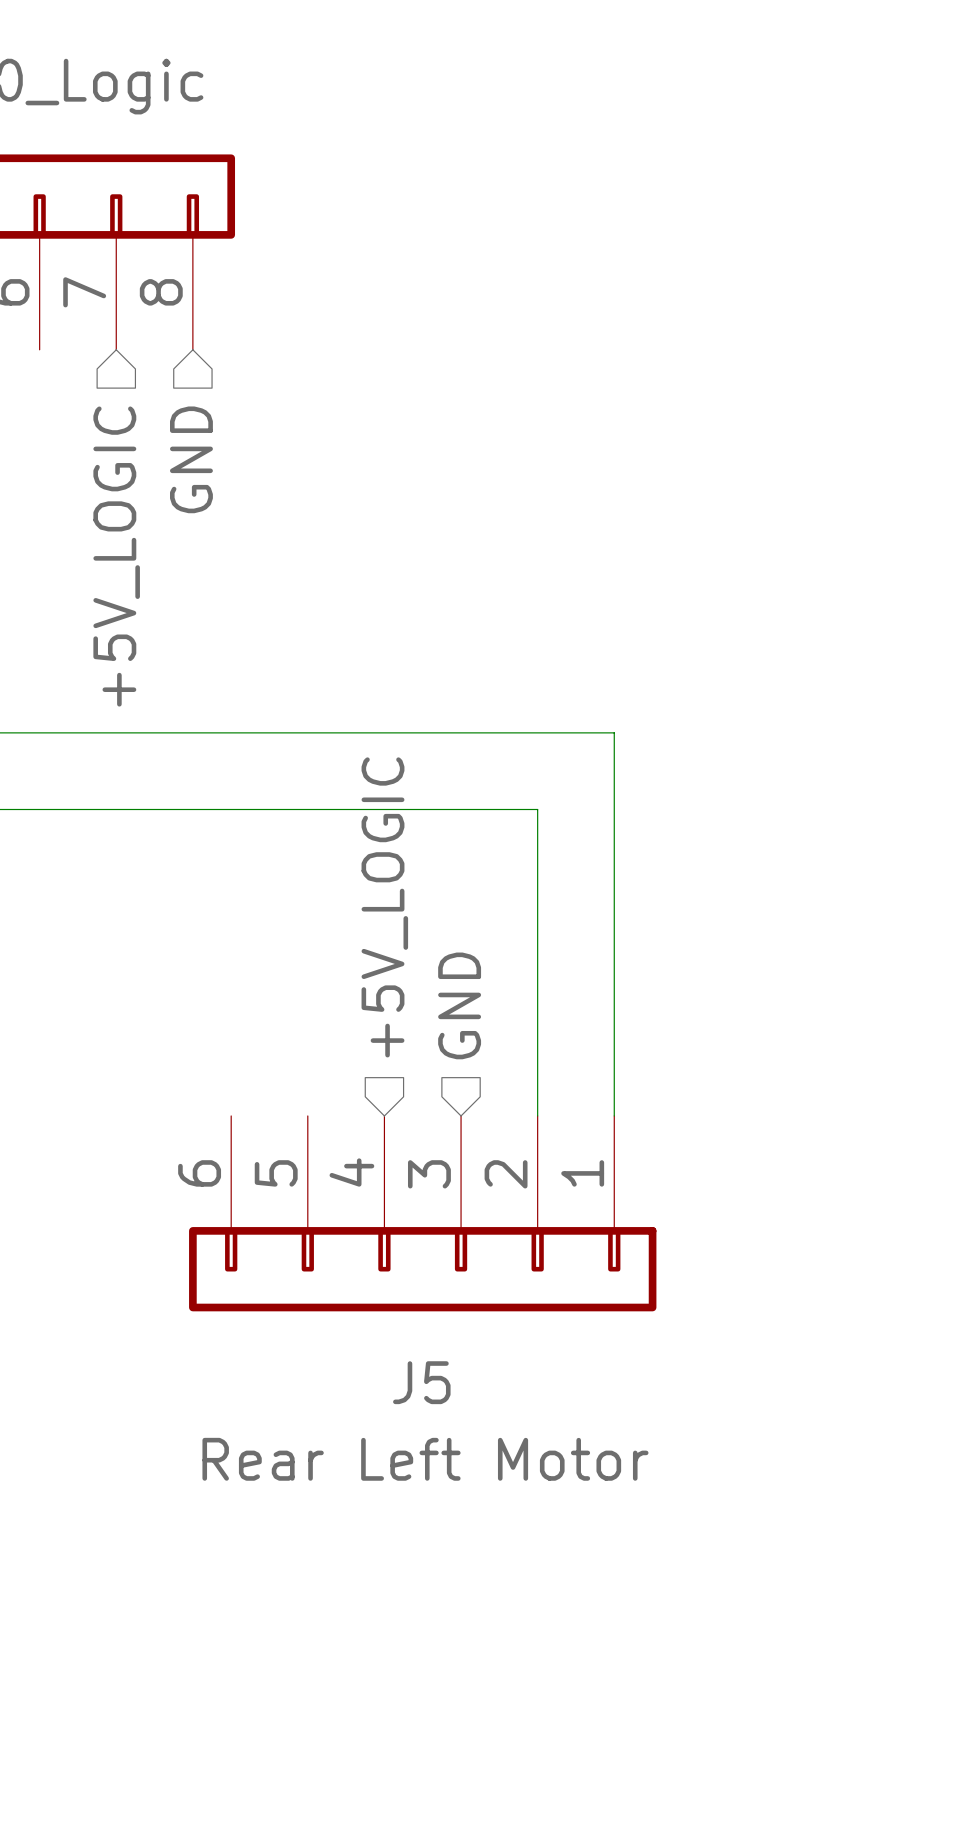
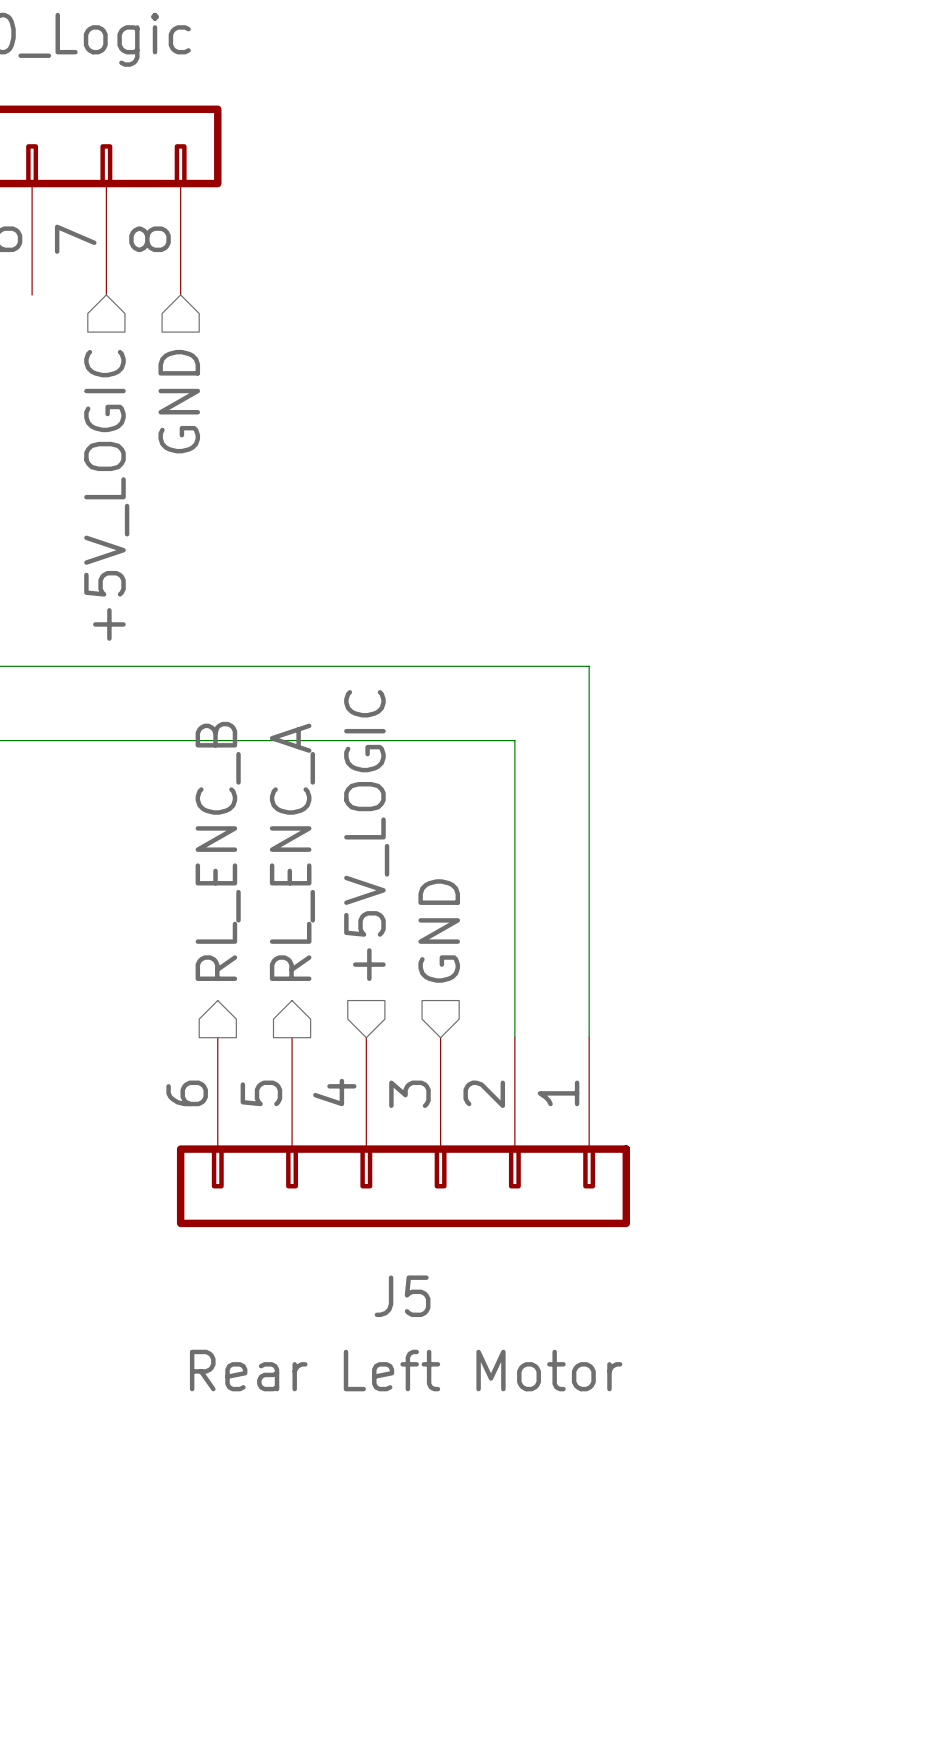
hierarchical label: none -> RL_ENC_B (218, 851)
hierarchical label: none -> RL_ENC_A (292, 852)

